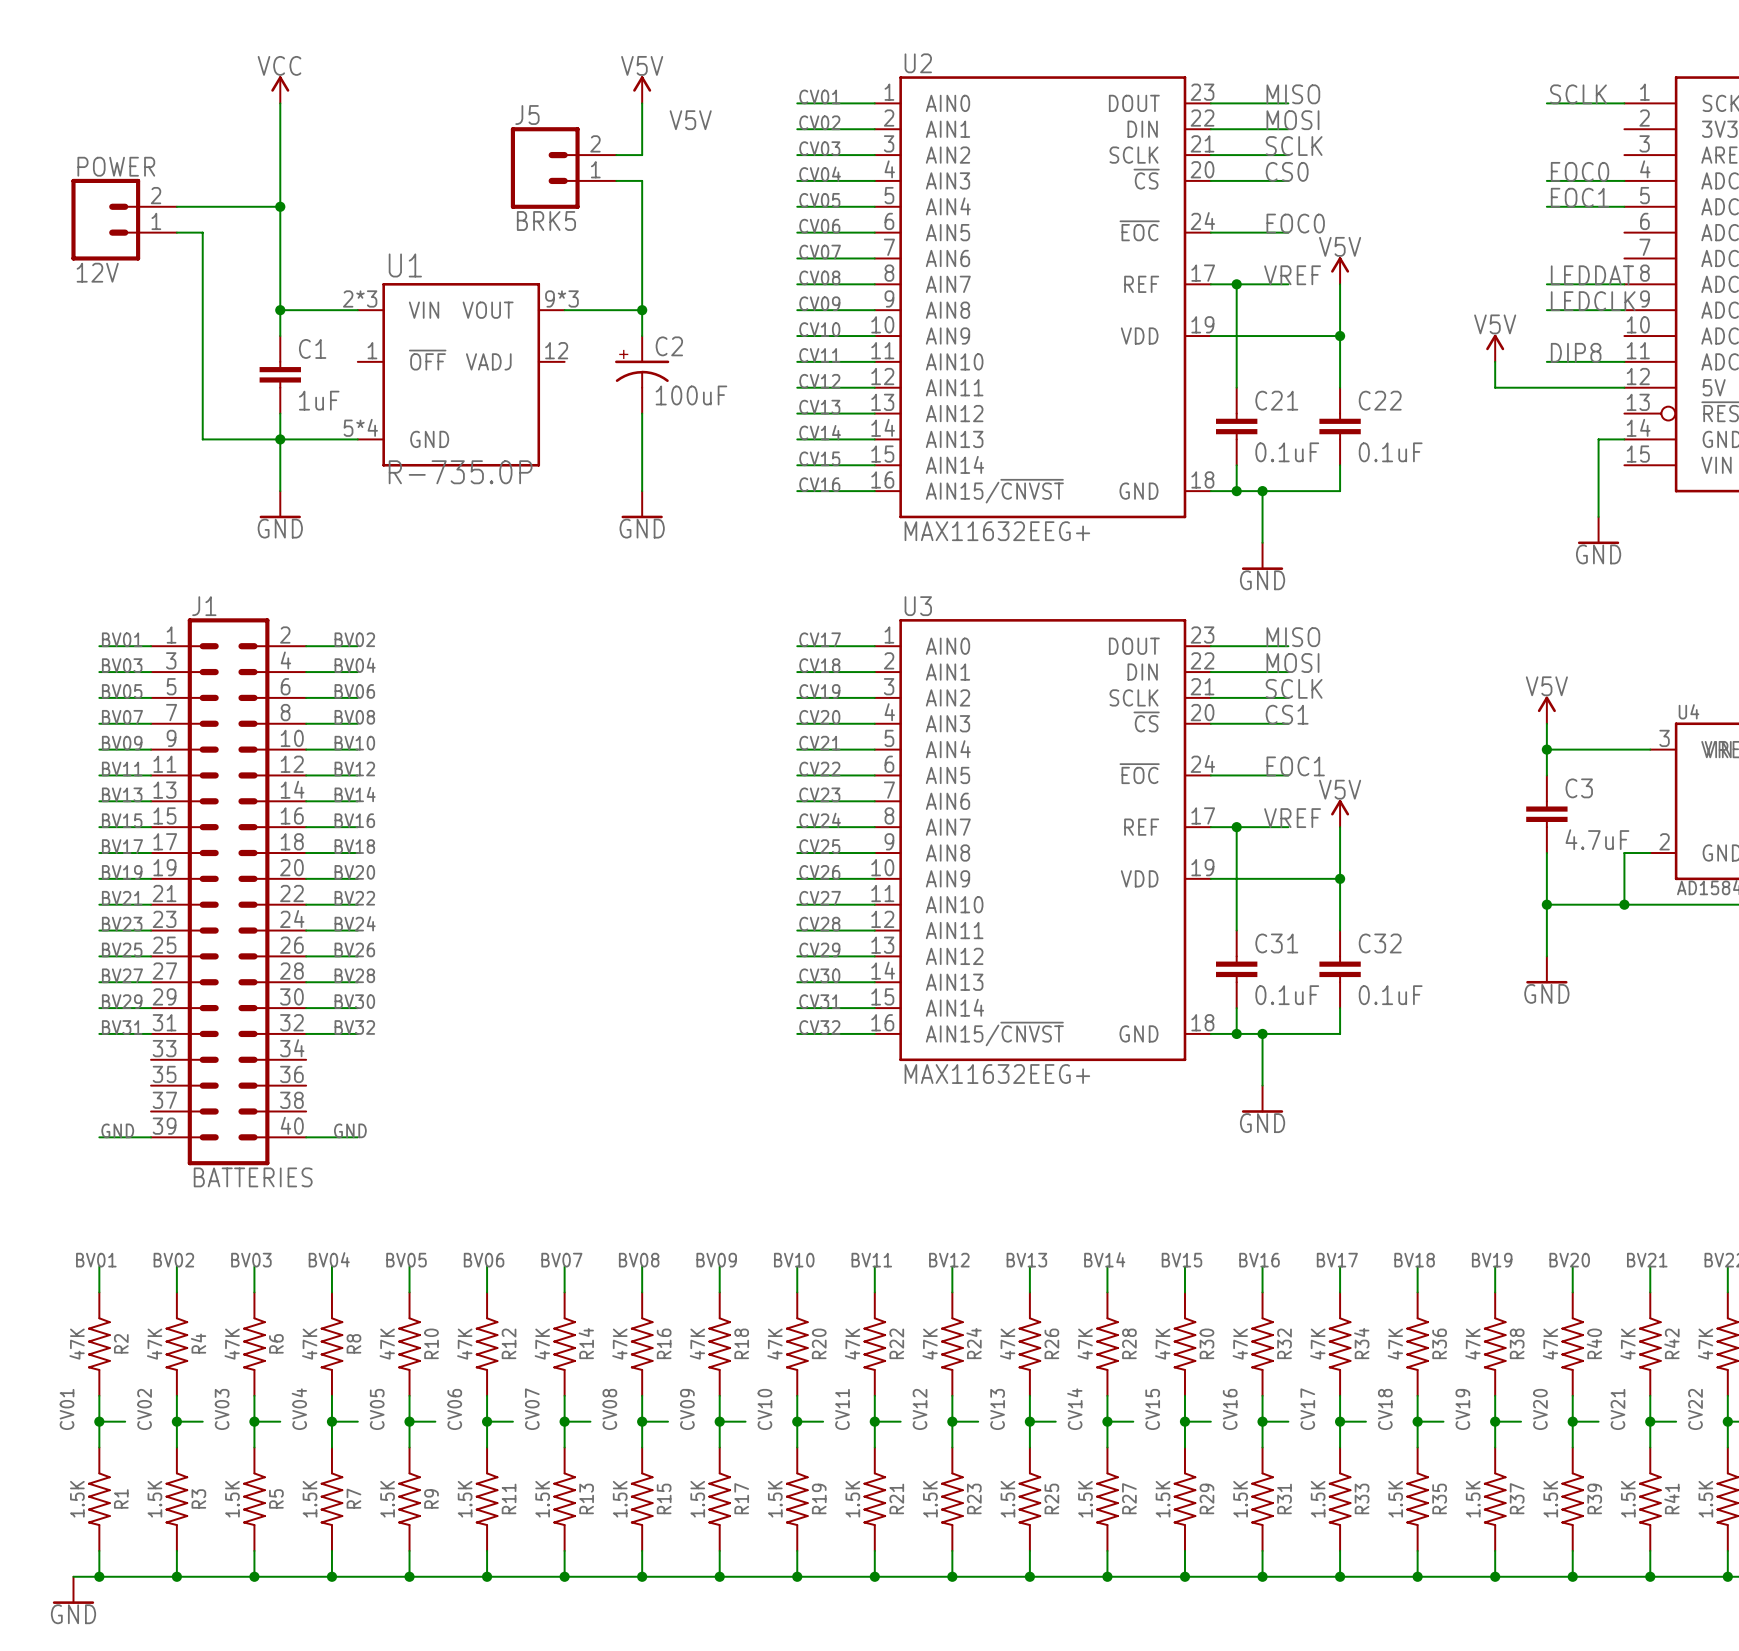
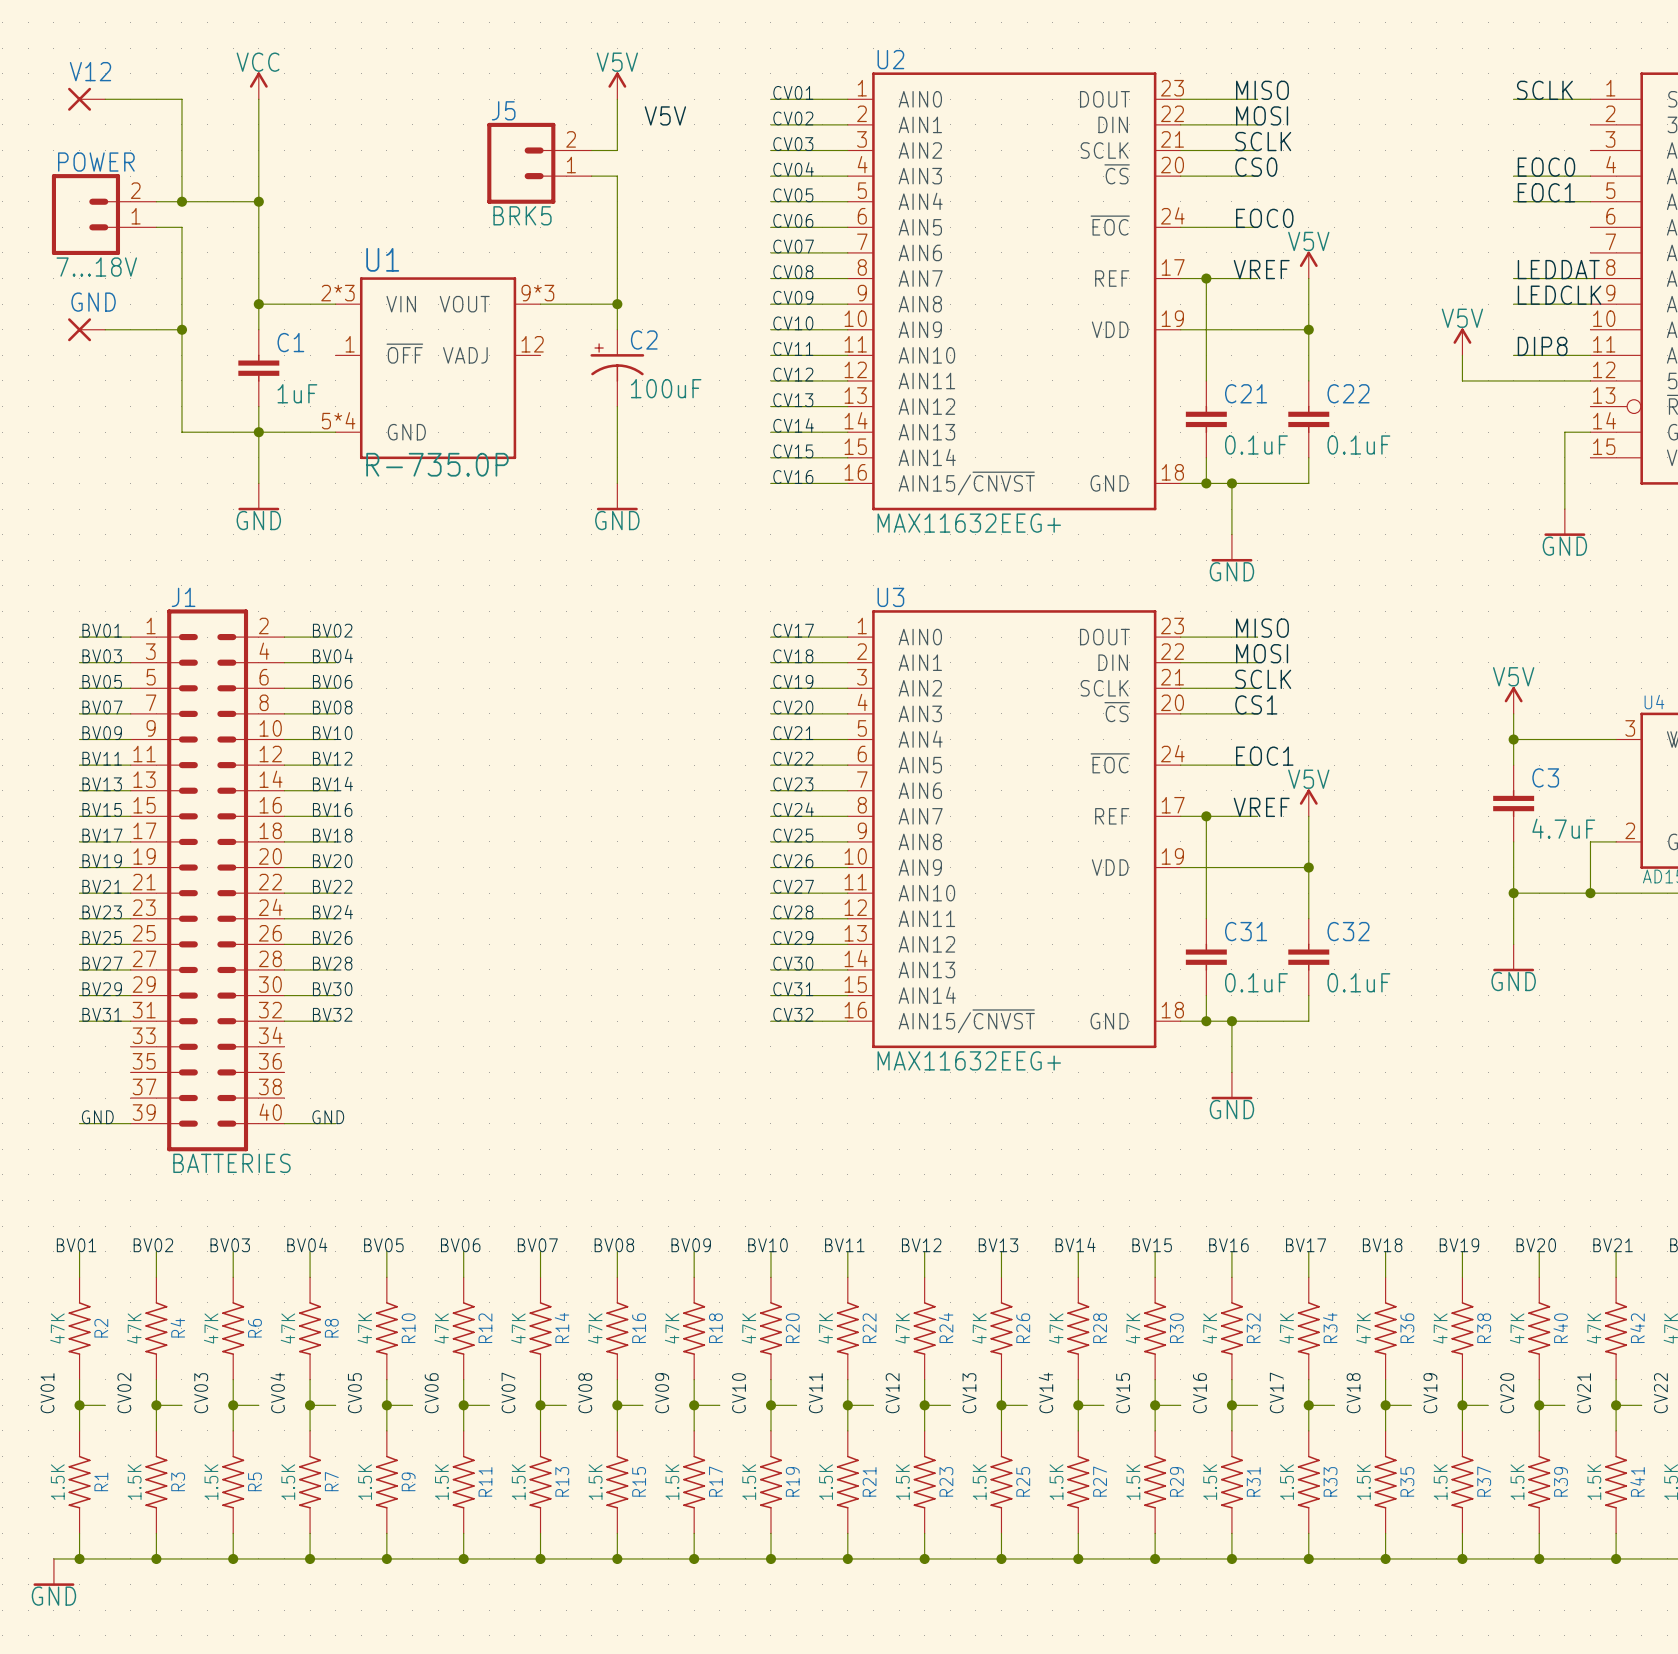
V12: none -> (86, 99)
wire: none -> (105, 99) (181, 99) (181, 201)
junction: none -> (181, 201)
POWER value: 12V (97, 272) -> 7...18V (96, 267)
GND: none -> (86, 329)
wire: none -> (105, 329) (181, 329)
junction: none -> (181, 329)

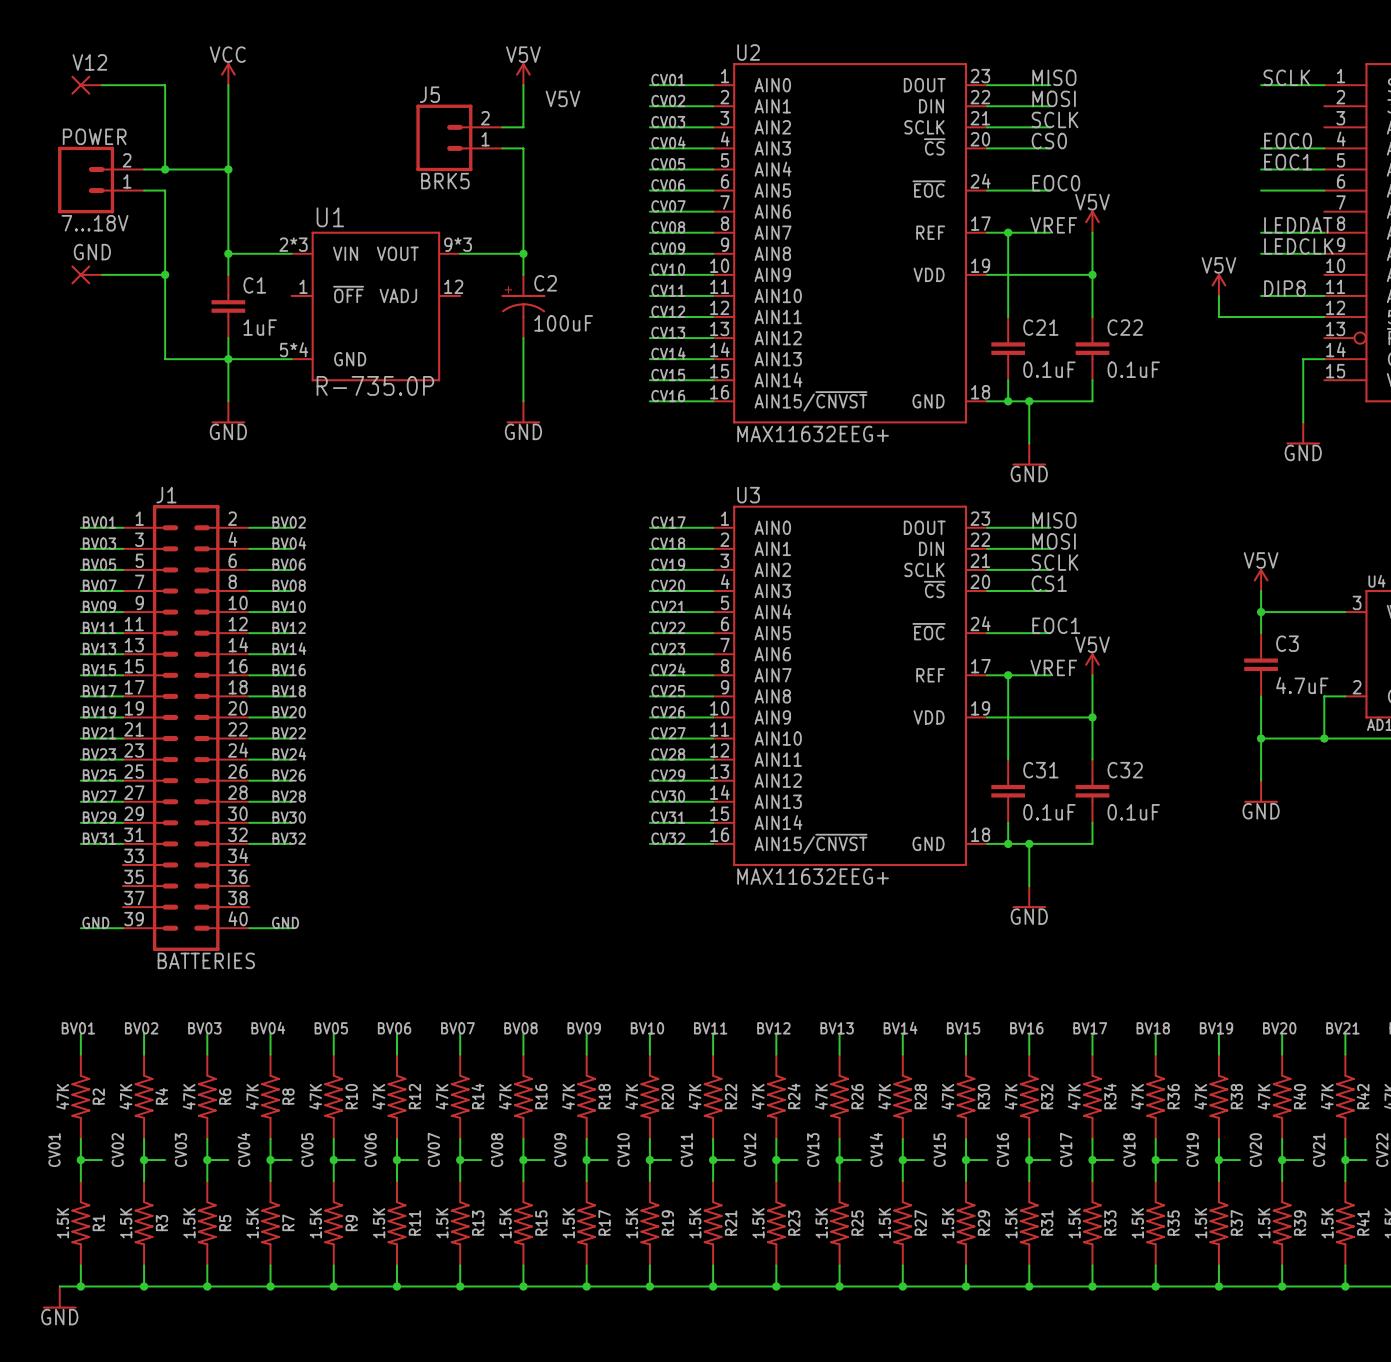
wire: none -> (1261, 190) (1324, 190)

